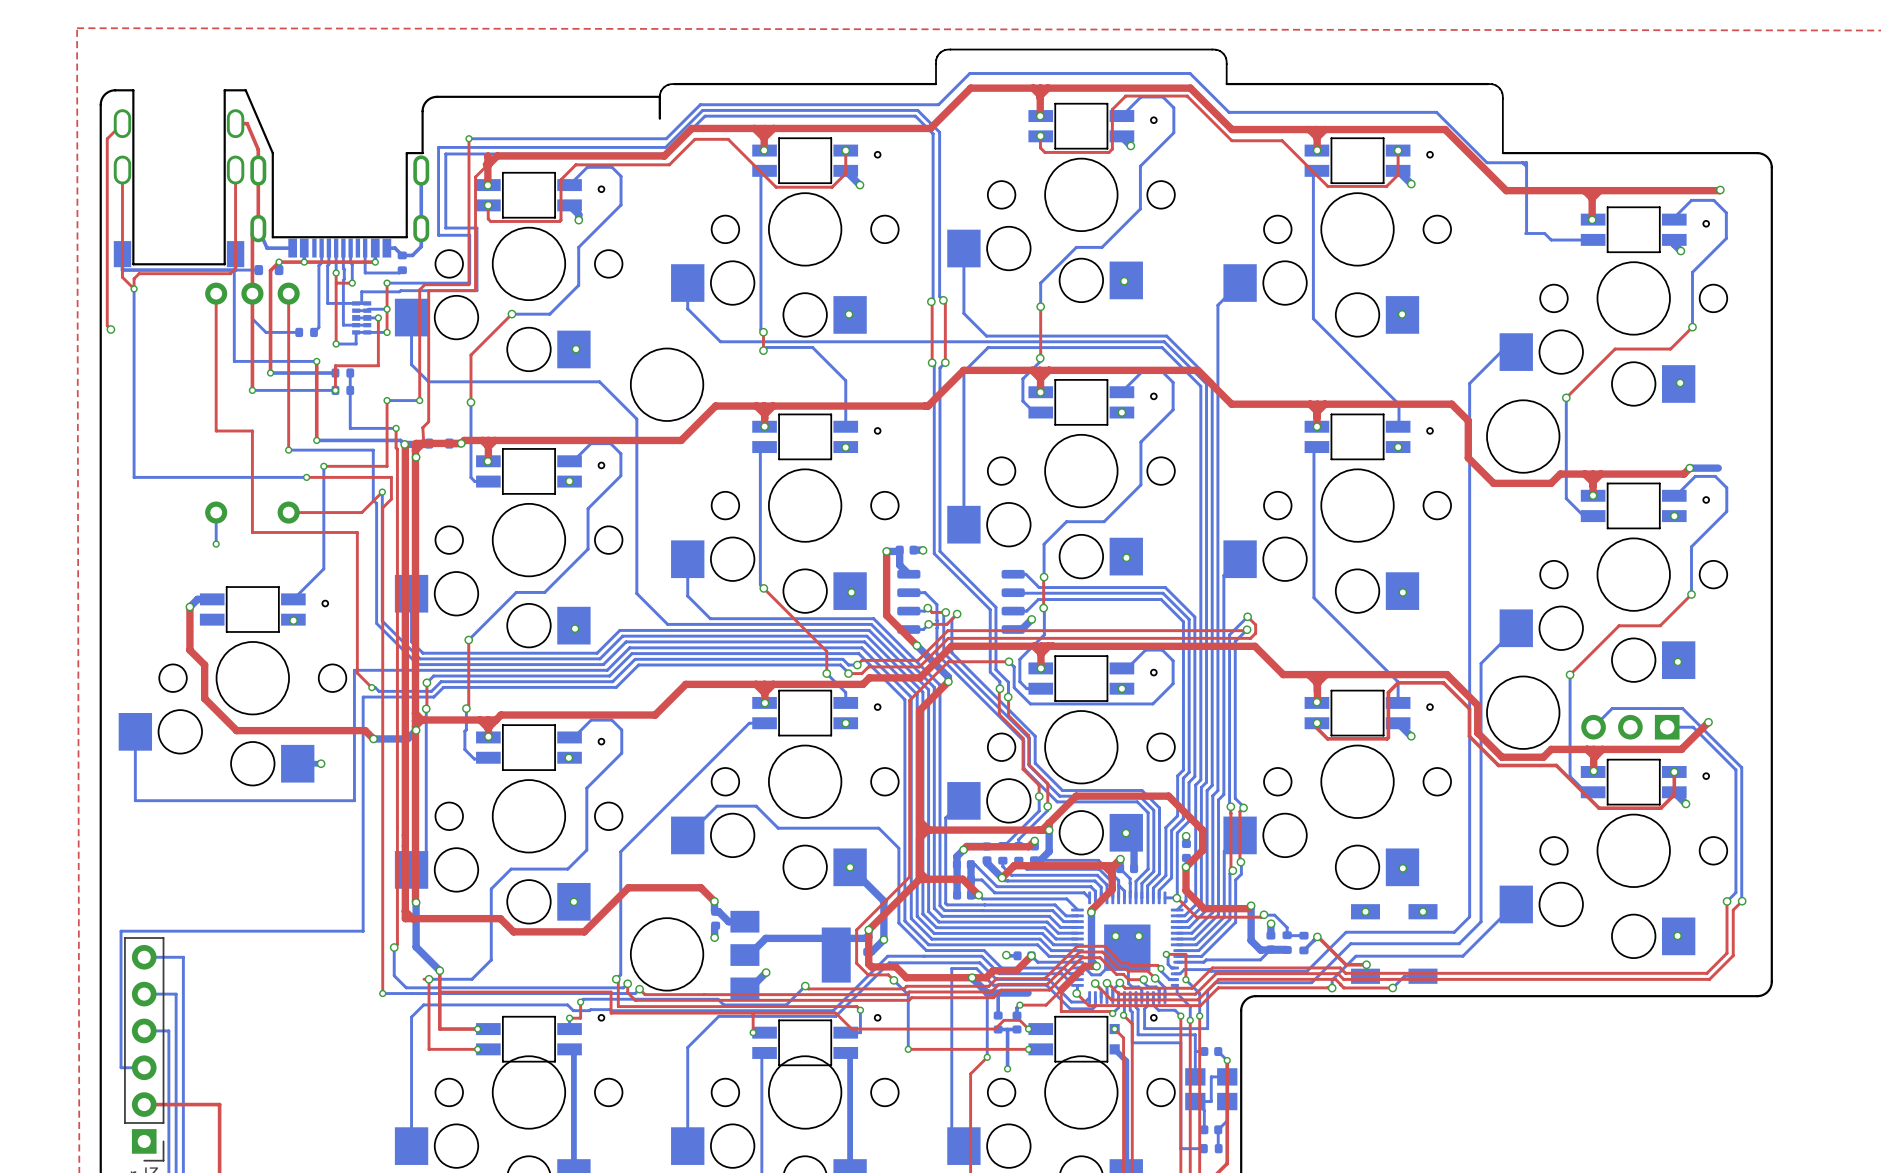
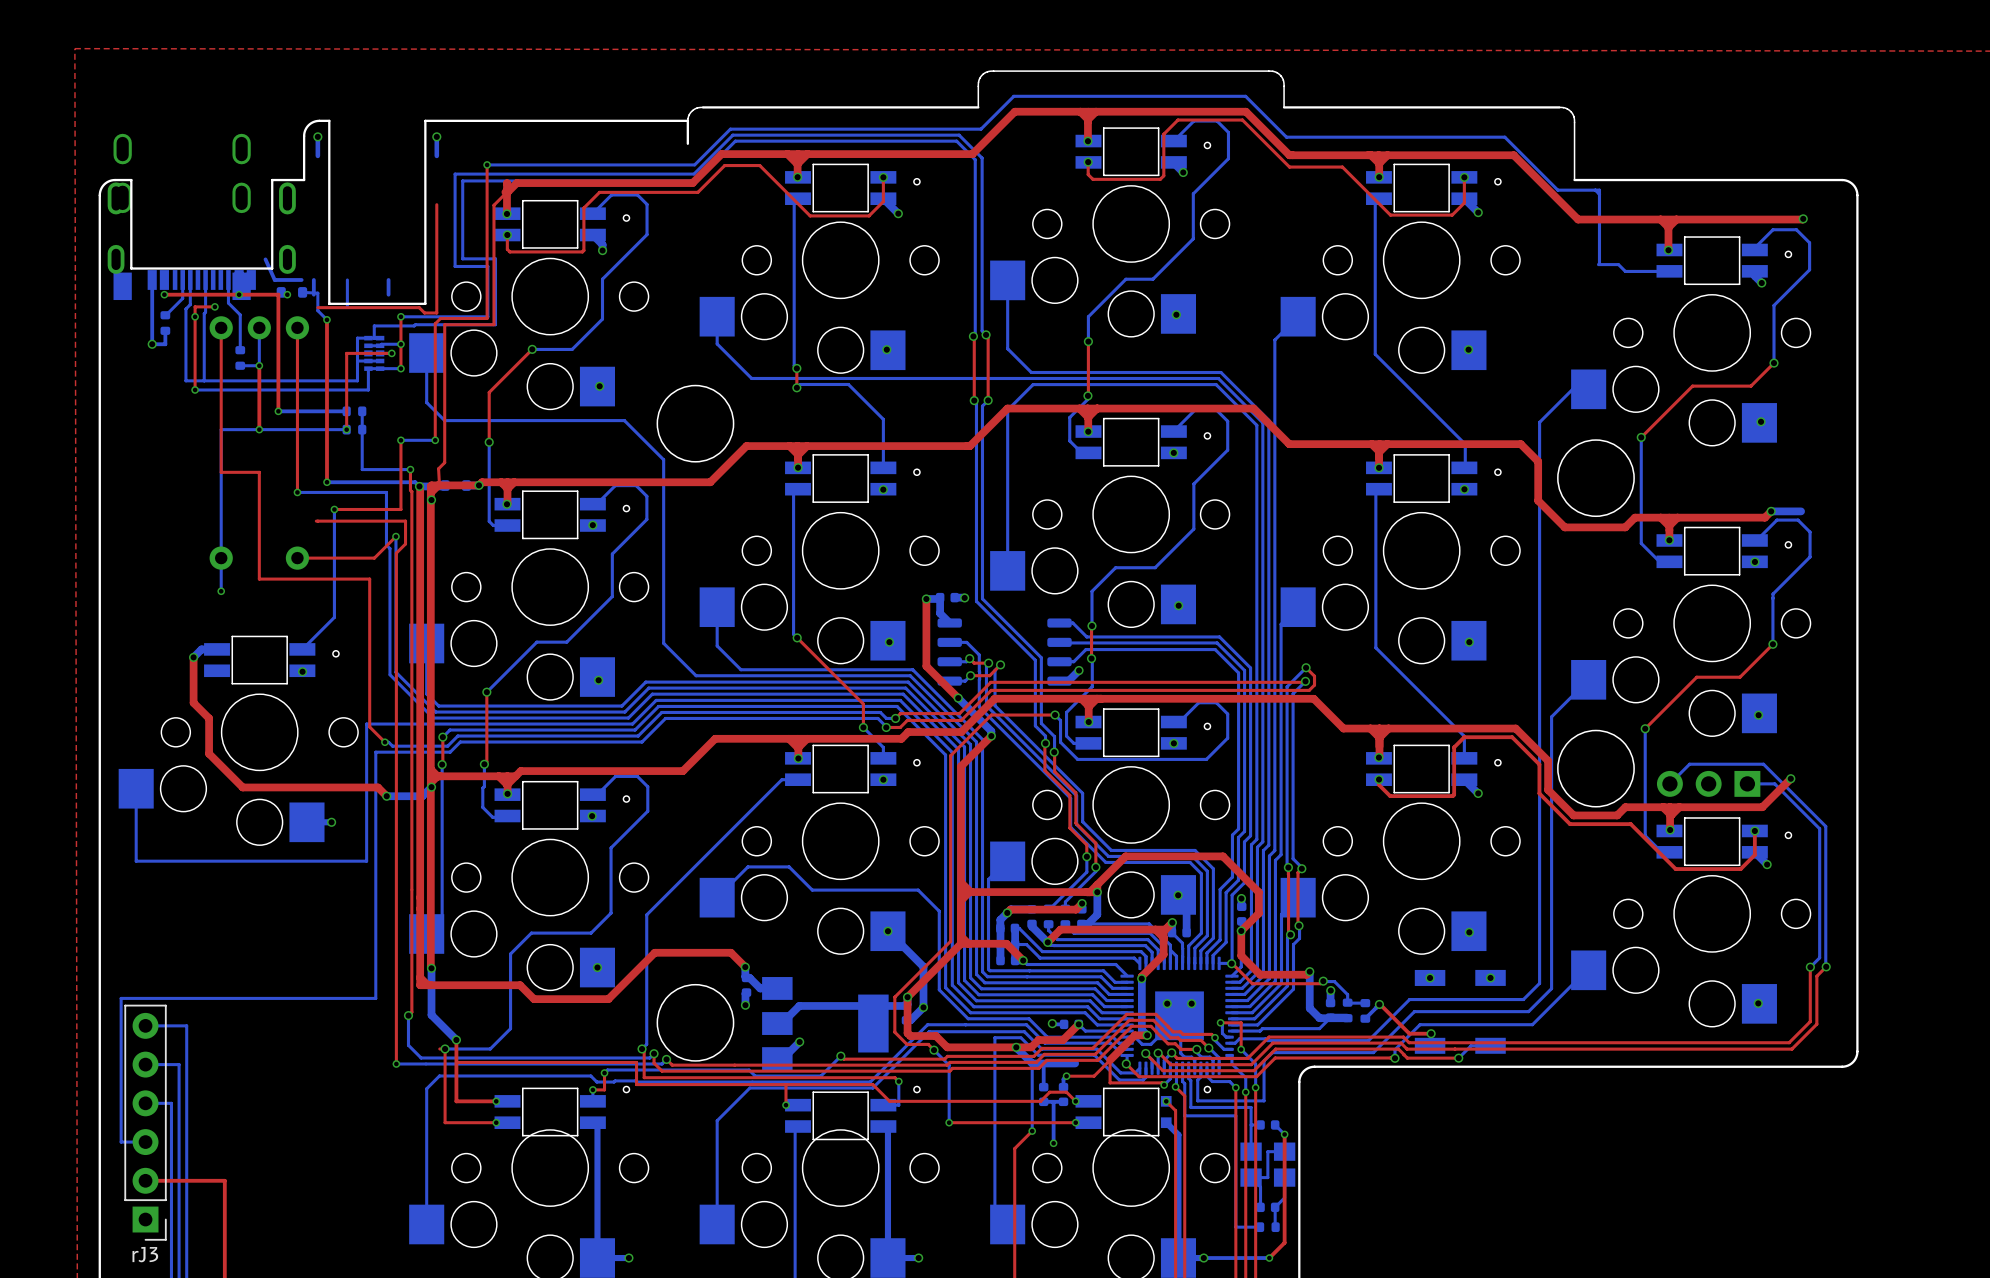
board edge: (437, 96) (428, 99) (422, 108) (422, 153) (406, 153) (406, 237) (272, 237) (272, 153) (245, 90) (224, 90) (224, 264) (133, 264) (133, 90) (112, 90) (102, 98) (100, 167) -> (453, 120) (425, 120) (425, 303) (329, 303) (329, 120) (314, 121) (305, 129) (304, 180) (272, 180) (272, 268) (131, 268) (131, 180) (108, 181) (102, 187) (99, 195)
bottom track: none -> (317, 136) (317, 155)
via: none -> (317, 136)
bottom track: none -> (436, 136) (436, 155)
via: none -> (436, 136)
top track: (122, 123) (107, 138) (107, 325) (110, 329) -> none
top track: (235, 123) (247, 123) (258, 149) (258, 228) (252, 234) (252, 329) -> none
top track: (122, 170) (122, 277) (134, 288) (134, 278) (139, 273) (191, 273) -> (195, 389) (195, 306)
top track: (235, 170) (235, 268) (230, 273) (210, 273) -> none
bottom track: (421, 170) (421, 246) (412, 255) (402, 255) (394, 248) (386, 248) -> none
top track: none -> (436, 204) (436, 312) (424, 312) (419, 307) (317, 307)
part position: (339, 206) -> (201, 236)
bottom track: none -> (152, 279) (152, 344) (165, 344) (165, 330)
bottom track: none -> (182, 279) (182, 298) (165, 315)
bottom track: none -> (190, 279) (190, 304) (185, 308) (185, 380) (347, 380)
bottom track: none -> (205, 279) (204, 380)
bottom track: (321, 248) (321, 262) (318, 265) (318, 327) (314, 332) -> none
bottom track: (328, 248) (327, 303) (345, 303) -> none
bottom track: (343, 248) (343, 325) (345, 325) -> none
bottom track: (350, 248) (352, 283) -> none
bottom track: (365, 248) (365, 272) (399, 272) (402, 270) -> none
bottom track: (122, 254) (122, 270) (235, 270) (235, 254) -> none
bottom track: none -> (302, 292) (317, 293) (317, 310) (327, 319)
via: none -> (164, 294)
via: none -> (239, 294)
via: (304, 262) -> none
top track: (375, 262) (279, 262) (270, 270) -> (164, 294) (278, 294) (278, 303)
via: (375, 262) -> none
part: (402, 262) -> none
bottom track: (258, 270) (234, 270) (234, 281) -> (228, 279) (228, 303) (240, 314)
part position: (268, 270) -> (291, 292)
top track: (336, 272) (336, 344) -> none
via: (336, 272) -> none
via: none -> (214, 306)
via: none -> (195, 316)
top track: (336, 283) (352, 283) -> none
via: (352, 283) -> none
top track: none -> (327, 319) (327, 399)
via: none -> (327, 319)
bottom track: (134, 288) (134, 477) (306, 477) -> none
via: (134, 288) -> none
part: none -> (165, 323)
bottom track: (234, 314) (234, 361) (316, 361) -> none
top track: (378, 317) (378, 365) (335, 365) -> (391, 353) (346, 353) (346, 403)
bottom track: (252, 318) (266, 332) (299, 332) -> (259, 354) (259, 365) (240, 365)
via position: (110, 329) -> (152, 344)
via: none -> (259, 365)
part rotation: 0° (306, 332) -> 90° clockwise (240, 357)
part position: (306, 332) -> (240, 357)
via: (336, 344) -> none
bottom track: (345, 344) (356, 344) -> (357, 380) (357, 338)
bottom track: none -> (368, 380) (368, 389) (195, 389)
via: none -> (195, 389)
via: (316, 361) -> none
bottom track: none -> (259, 429) (221, 429) (221, 558)
via: (306, 477) -> none

